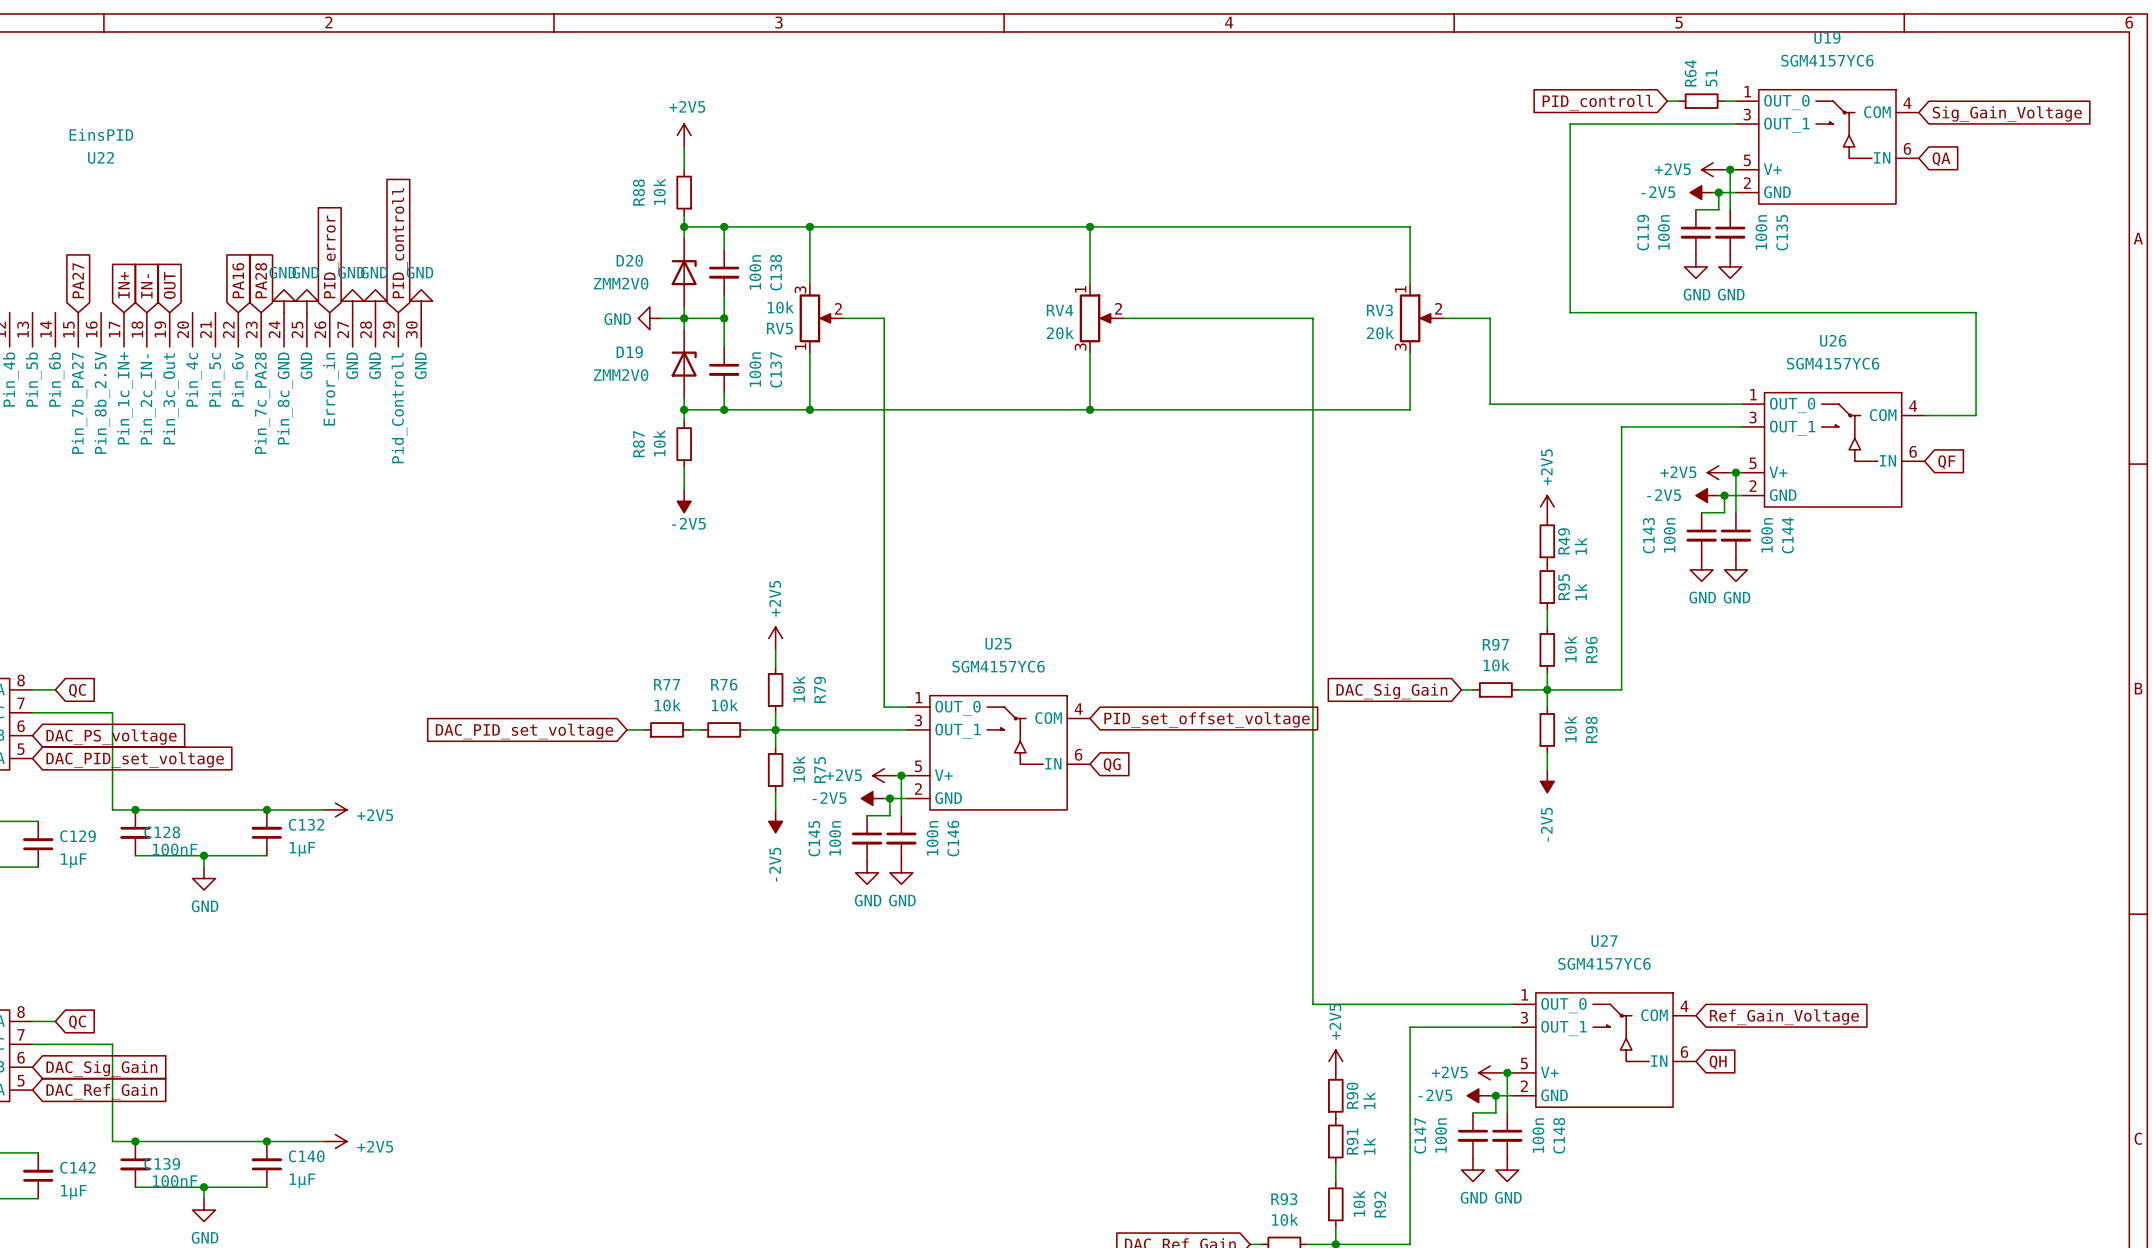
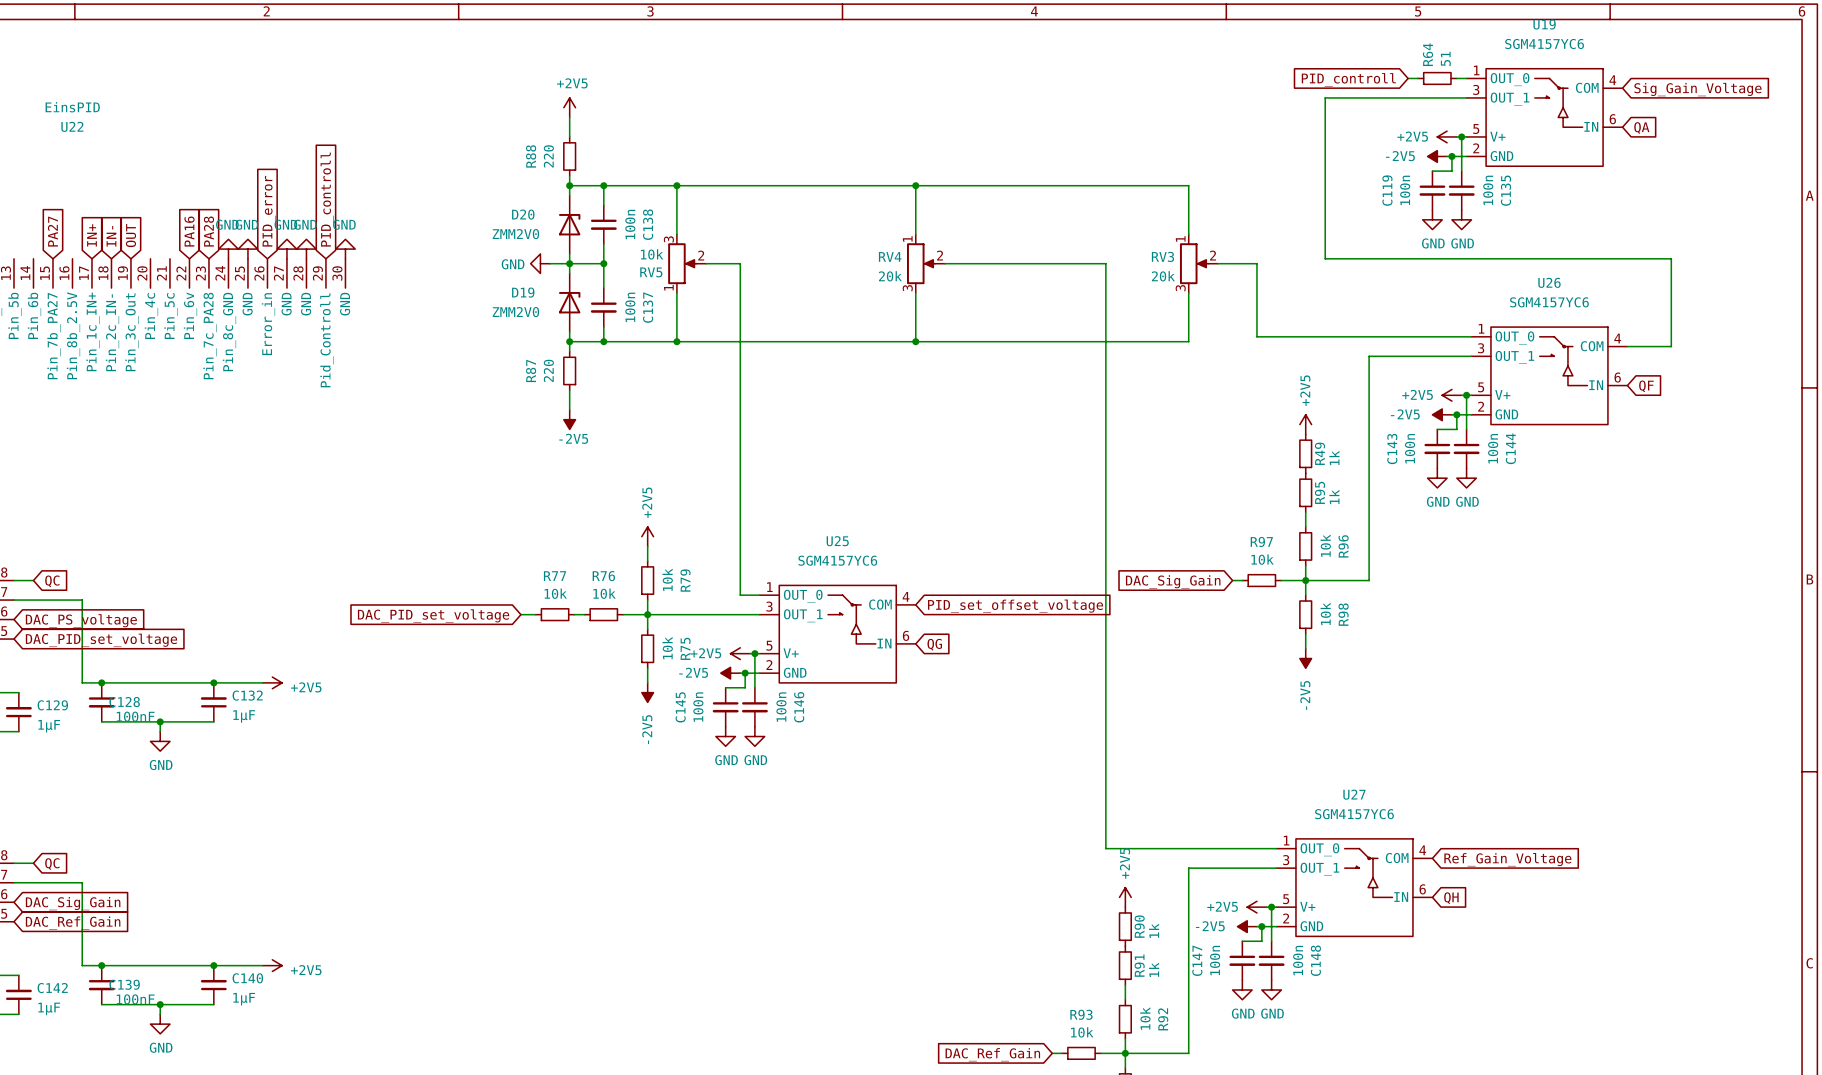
R88 value: 10k (659, 191) -> 220 (548, 156)
R87 value: 10k (659, 443) -> 220 (548, 370)

